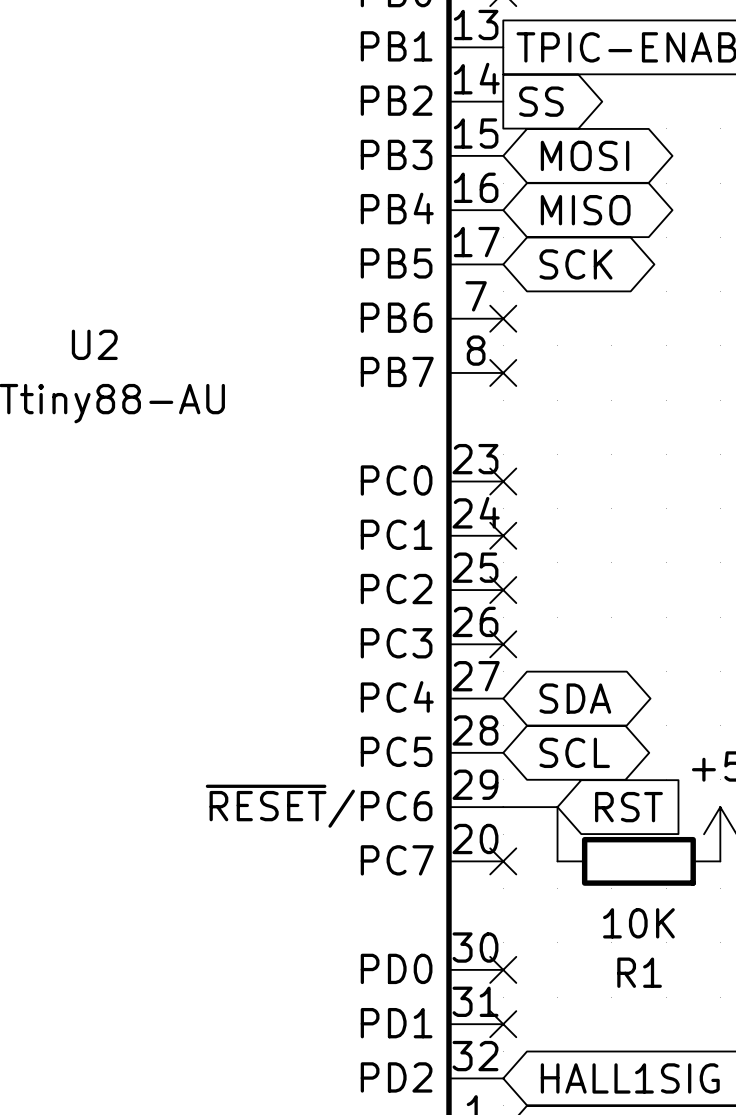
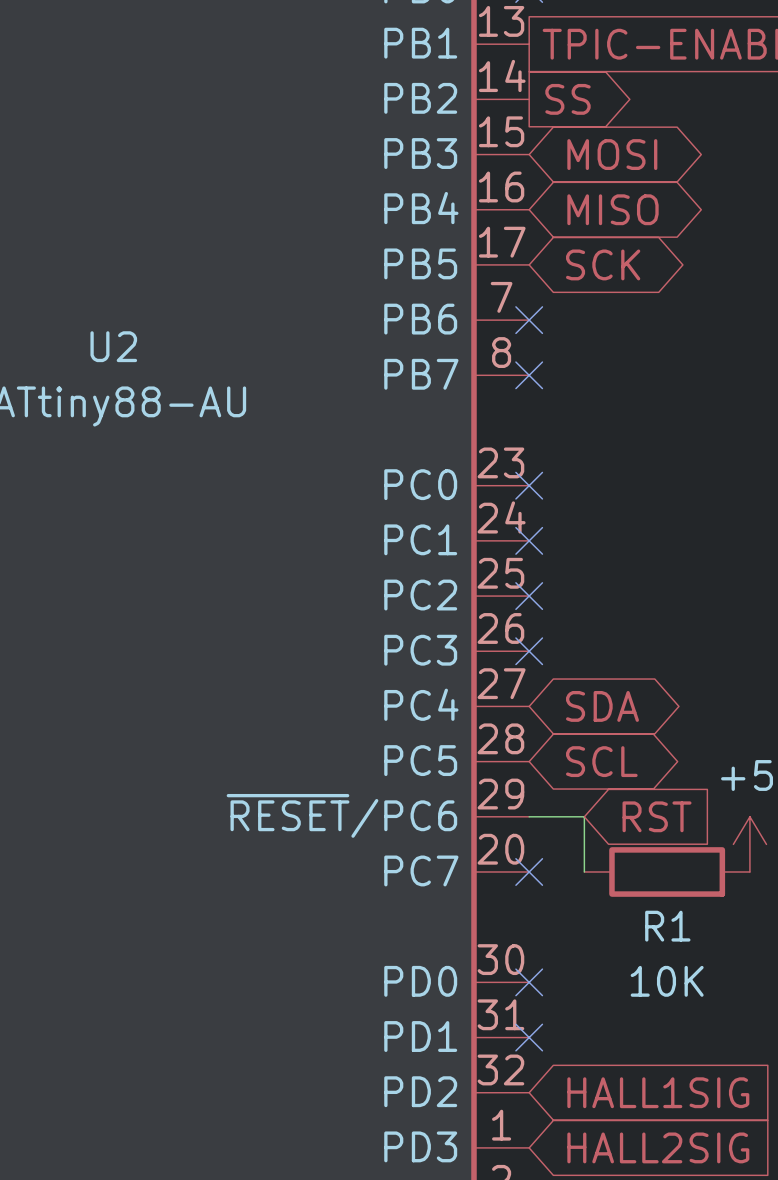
R1 value position: 10K (638, 923) -> 10K (667, 981)
R1 name position: R1 (639, 972) -> R1 (667, 926)

